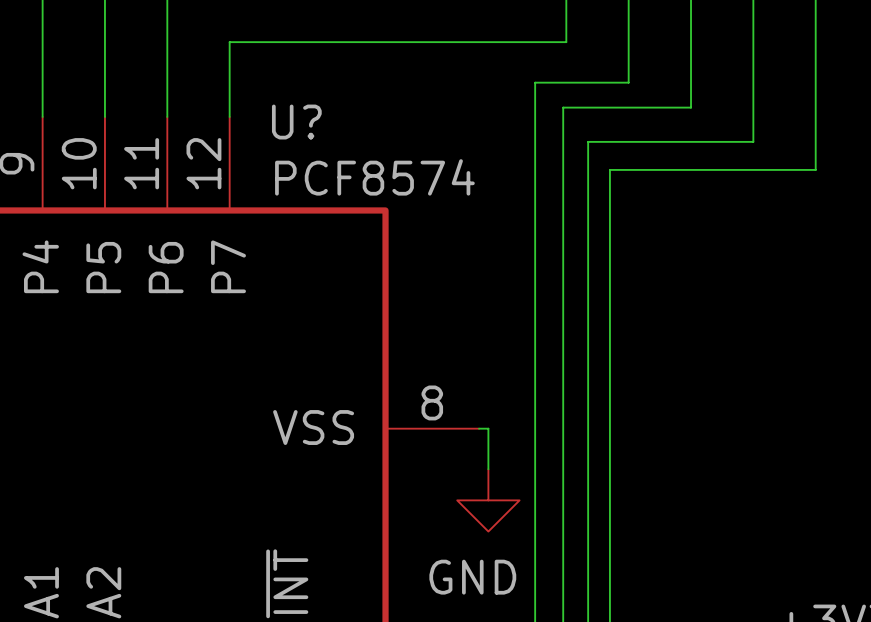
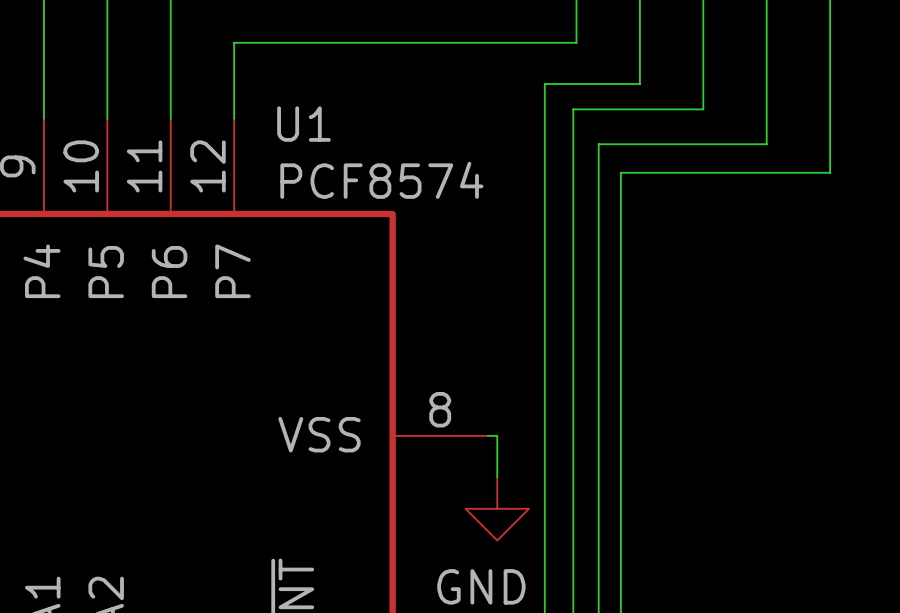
U? name: U? (296, 122) -> U1 (303, 124)

